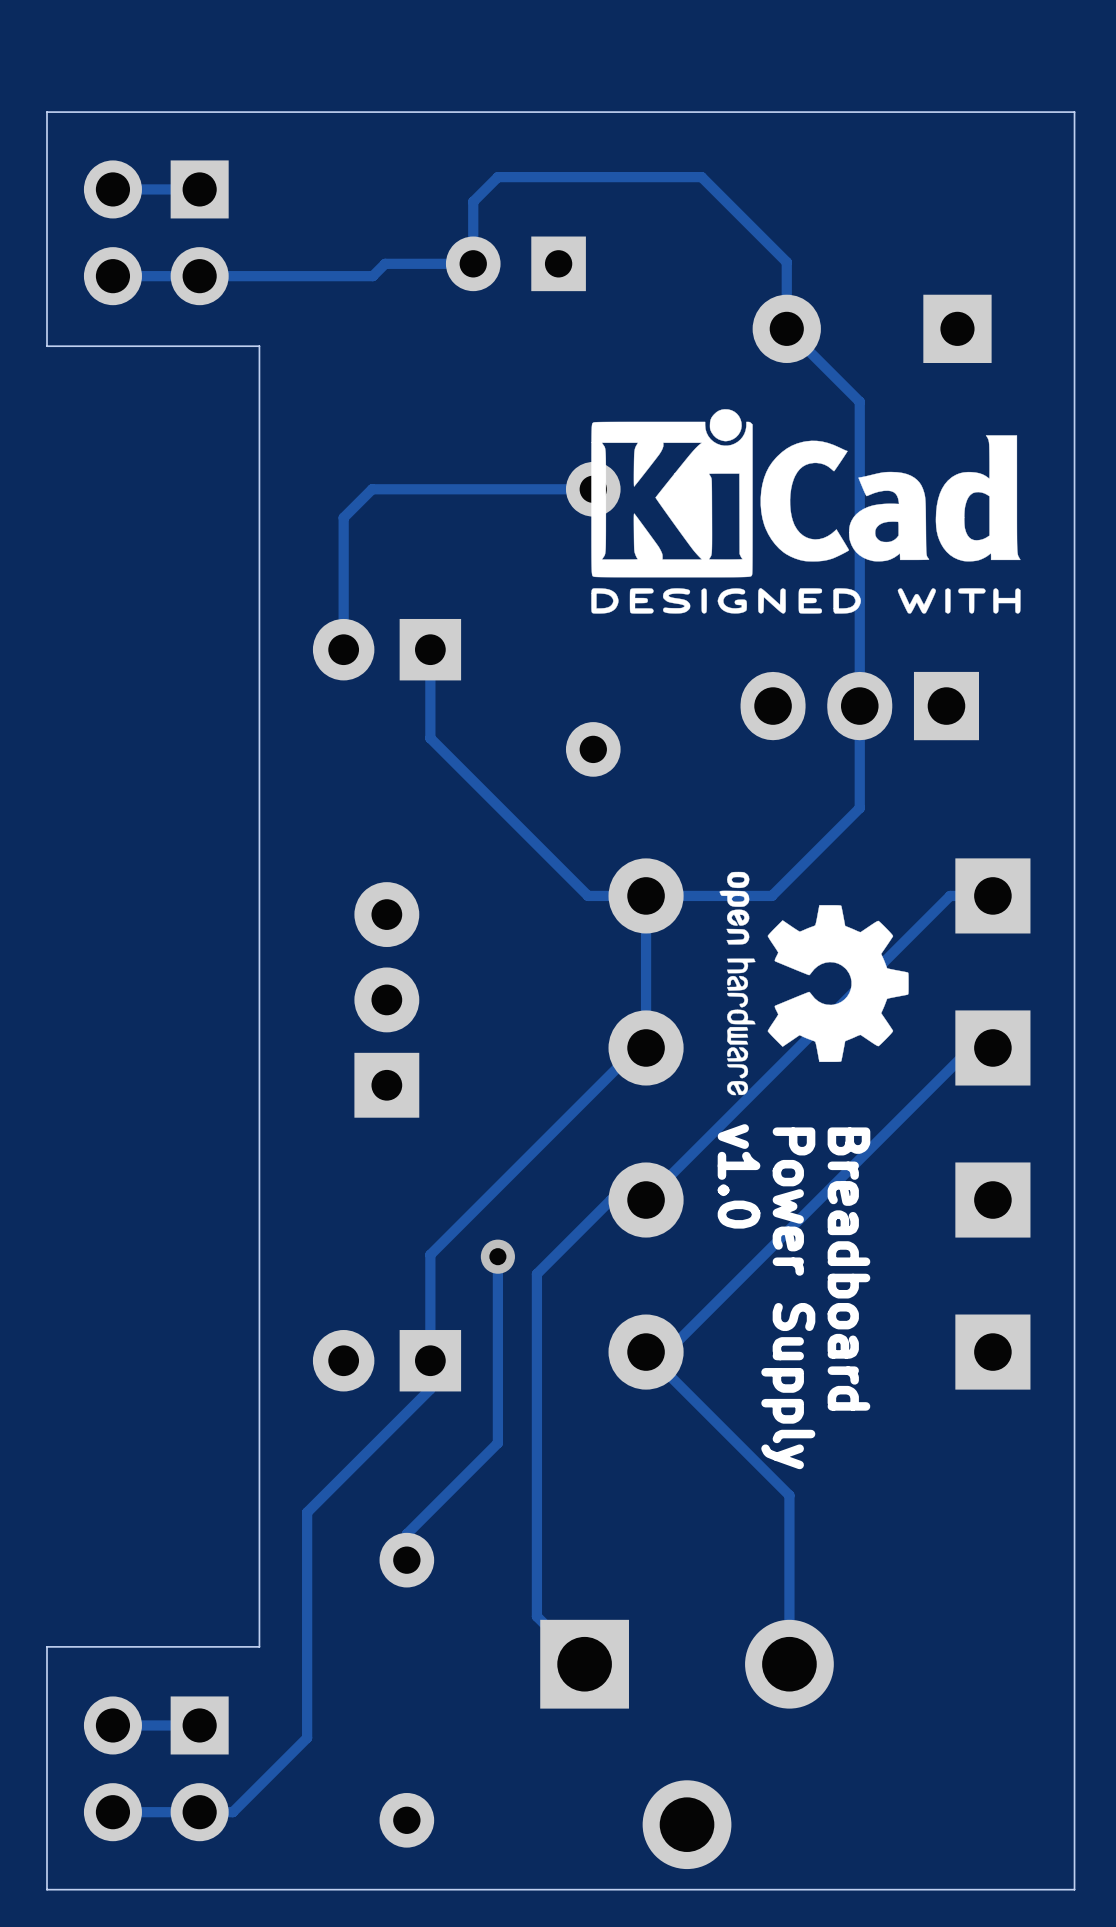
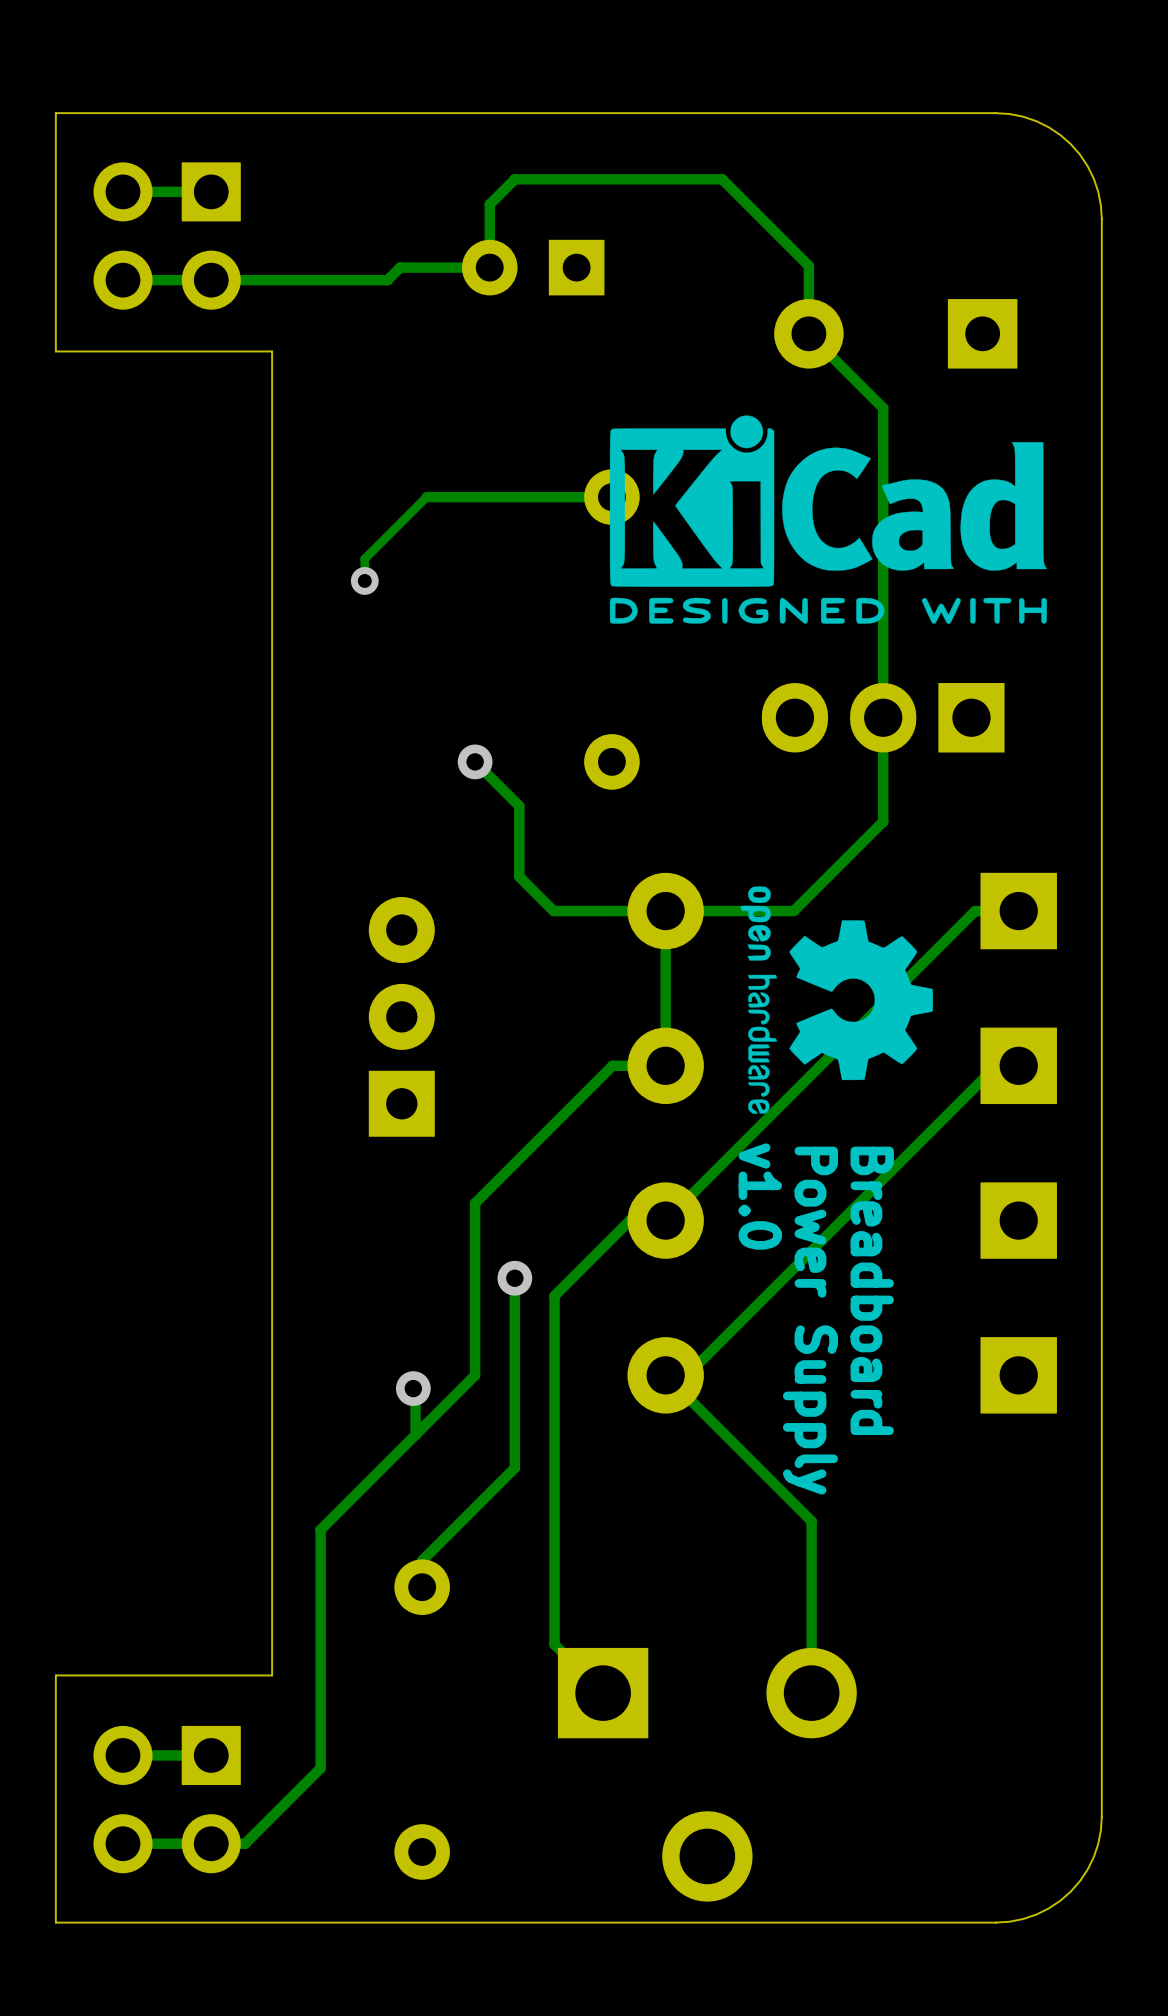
board edge: (970, 112) (1074, 112) (1074, 216) -> (995, 113) (1009, 114) (1036, 121) (1048, 127) (1070, 144) (1079, 154) (1093, 178) (1098, 191) (1101, 219)
track: (411, 489) (372, 489) (343, 517) (343, 649) -> (426, 497) (364, 558) (364, 580)
via: none -> (364, 580)
part: (387, 649) -> none
track: (430, 649) (430, 738) (588, 895) -> (475, 761) (519, 806) (519, 876) (553, 911) (606, 911)
via: none -> (475, 761)
track: (637, 1047) (430, 1254) (430, 1389) (307, 1512) -> (656, 1065) (612, 1065) (475, 1203) (475, 1375) (320, 1529) (320, 1538)
part: (387, 1360) -> none
track: none -> (413, 1388) (415, 1390) (415, 1434)
via: none -> (413, 1388)
board edge: (1074, 1785) (1074, 1889) (970, 1889) -> (1101, 1816) (1098, 1844) (1093, 1857) (1079, 1881) (1070, 1891) (1060, 1900) (1036, 1914) (1023, 1918) (995, 1922)

